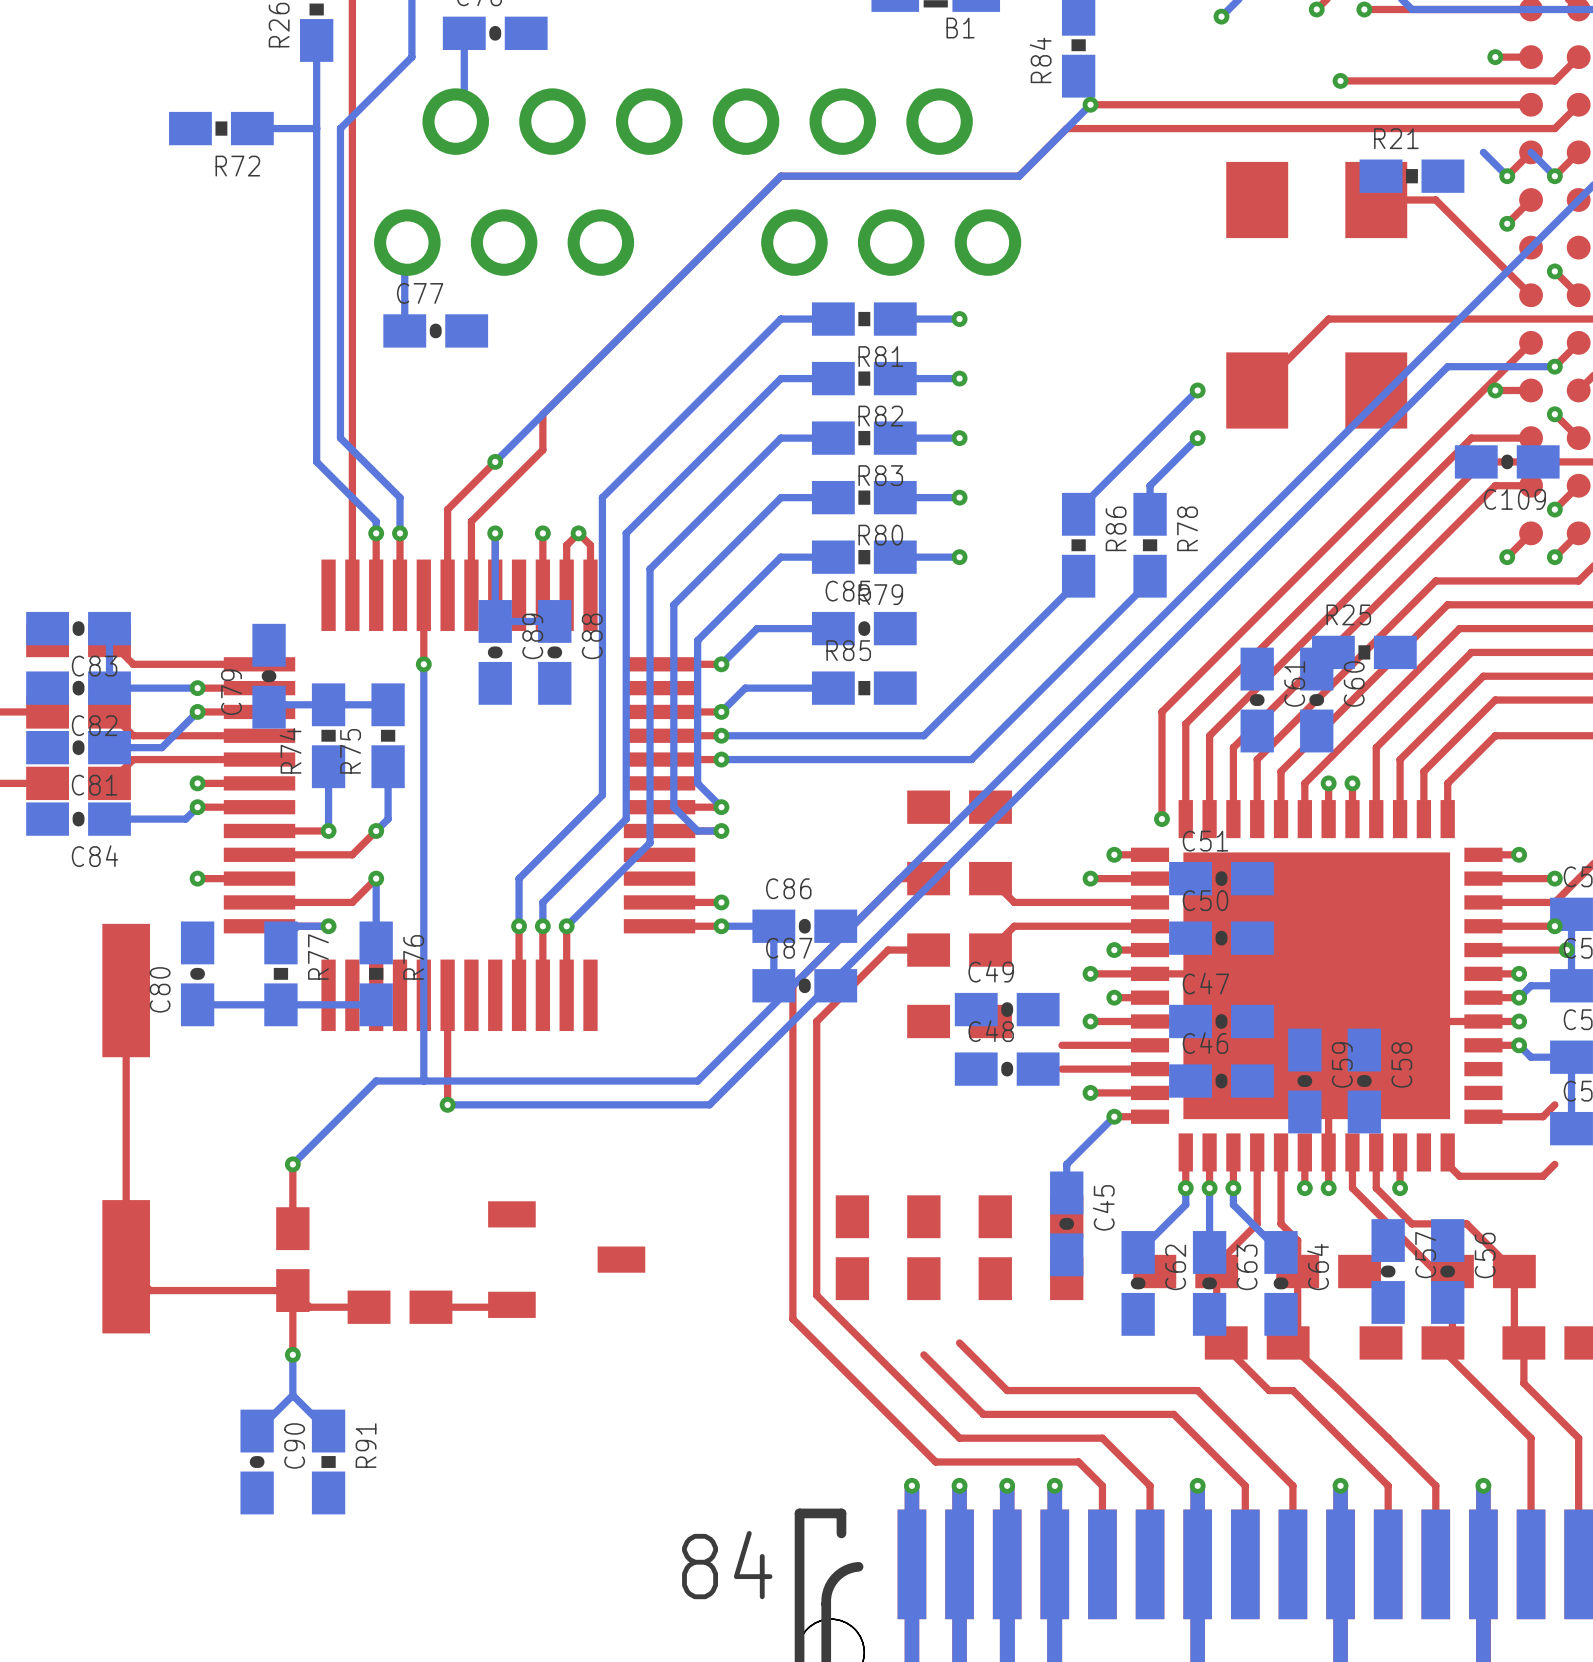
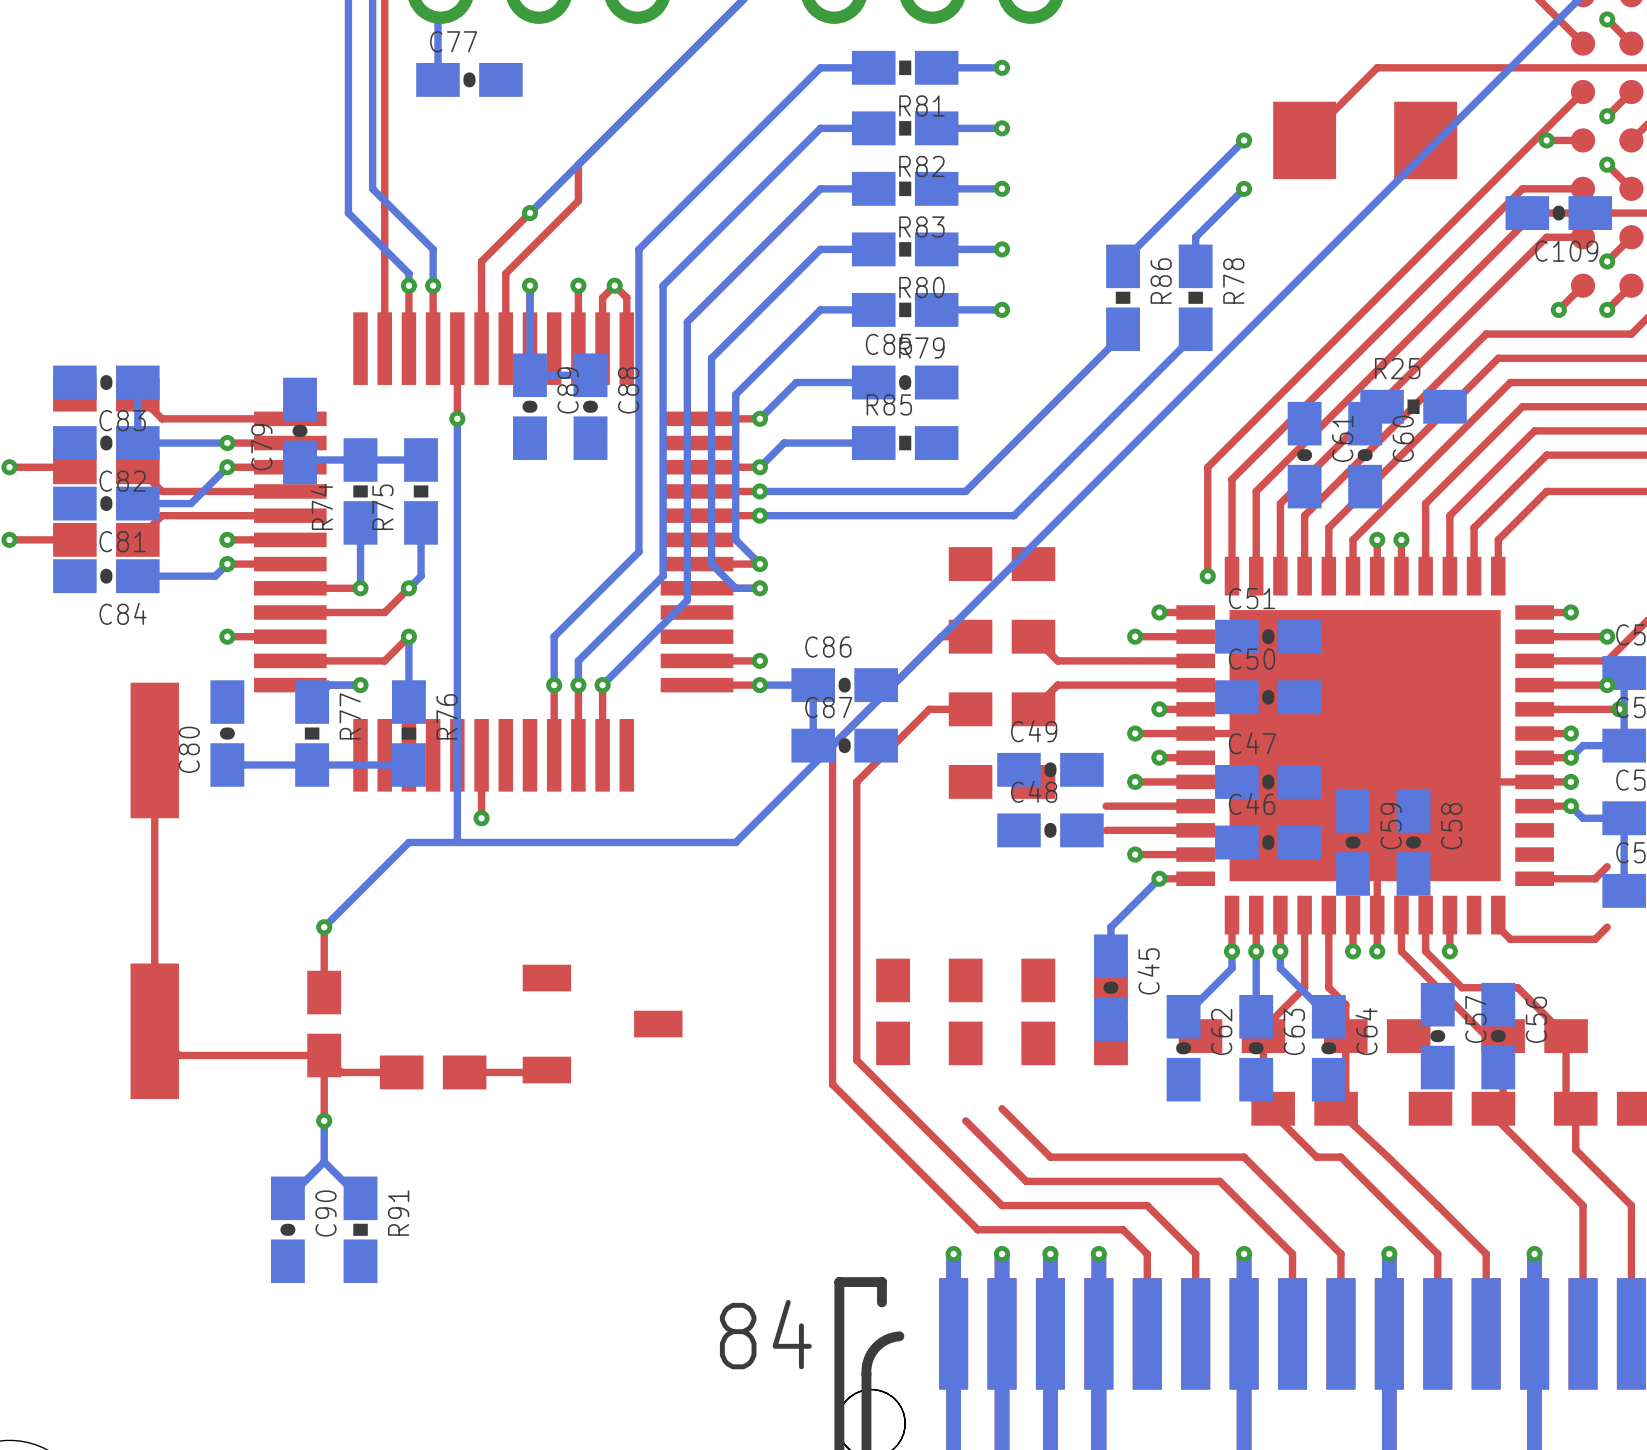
bottom track: (1554, 366) (1447, 366) (709, 1104) (447, 1104) -> none
top track: (447, 1057) (447, 1104) -> none
via position: (447, 1104) -> (481, 818)

